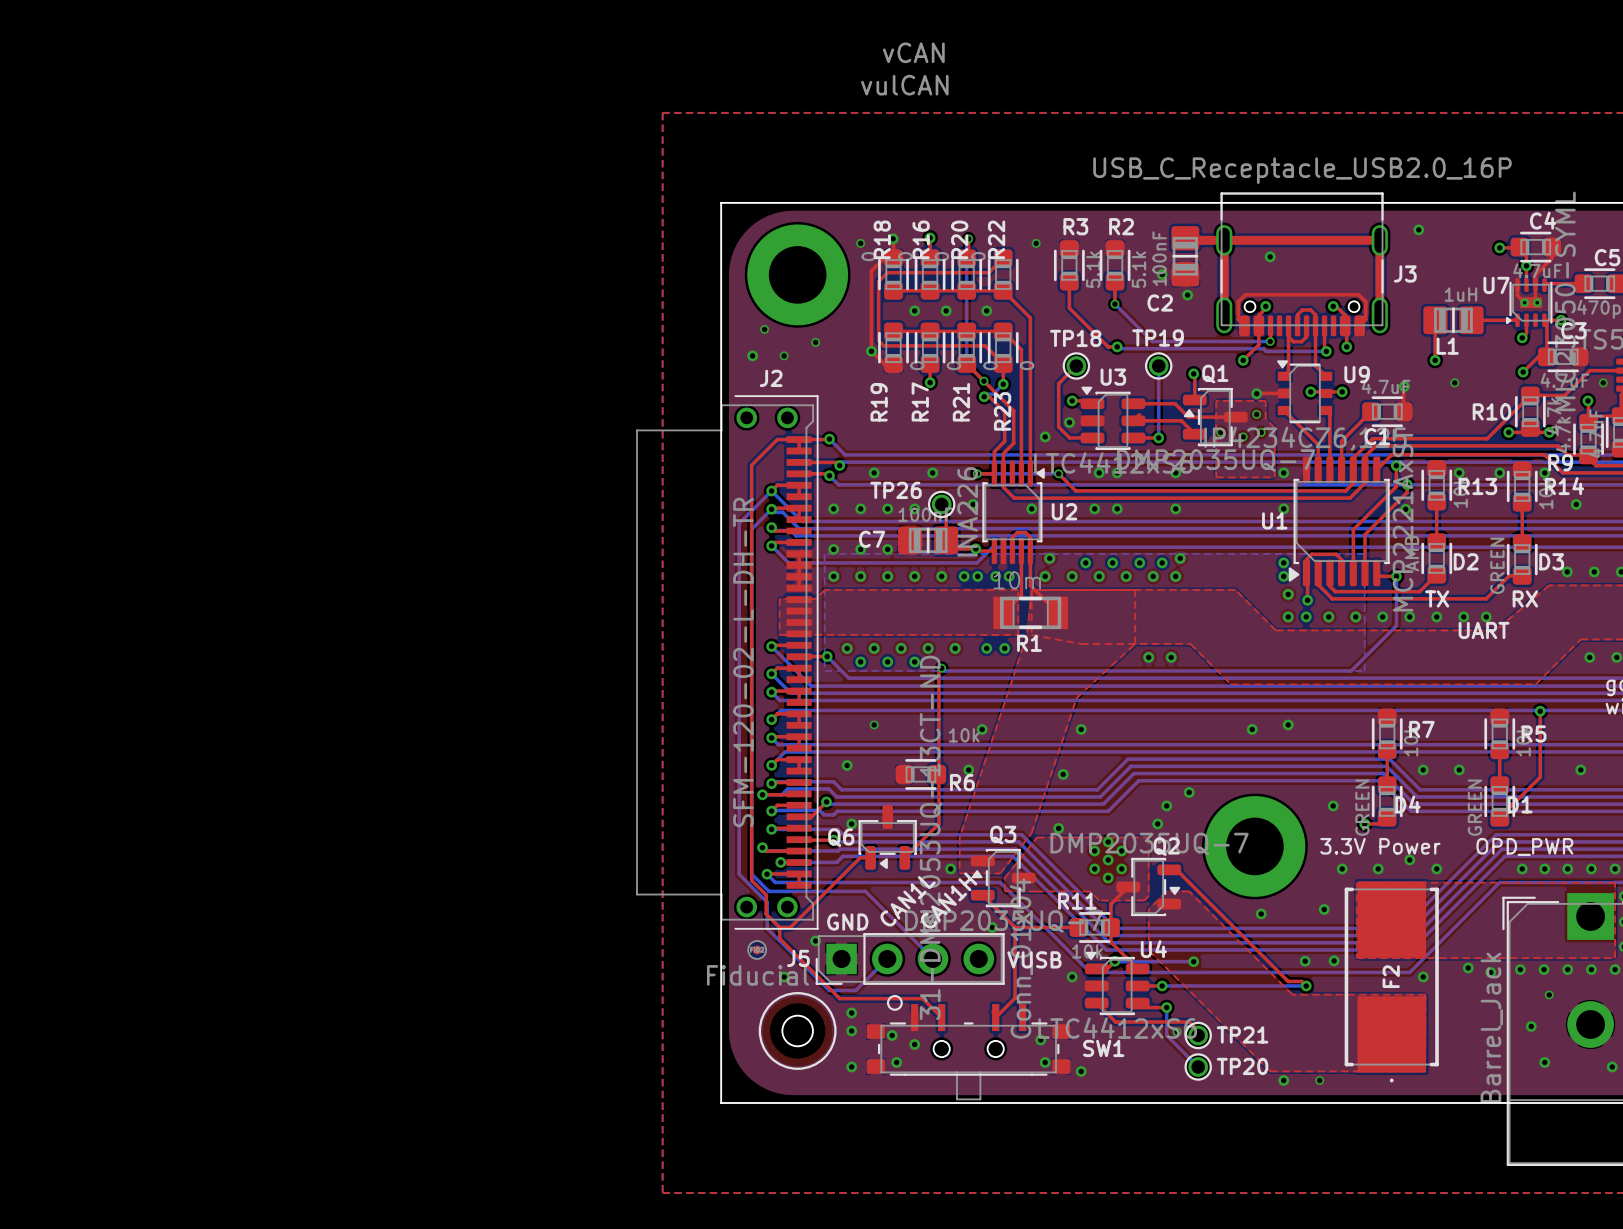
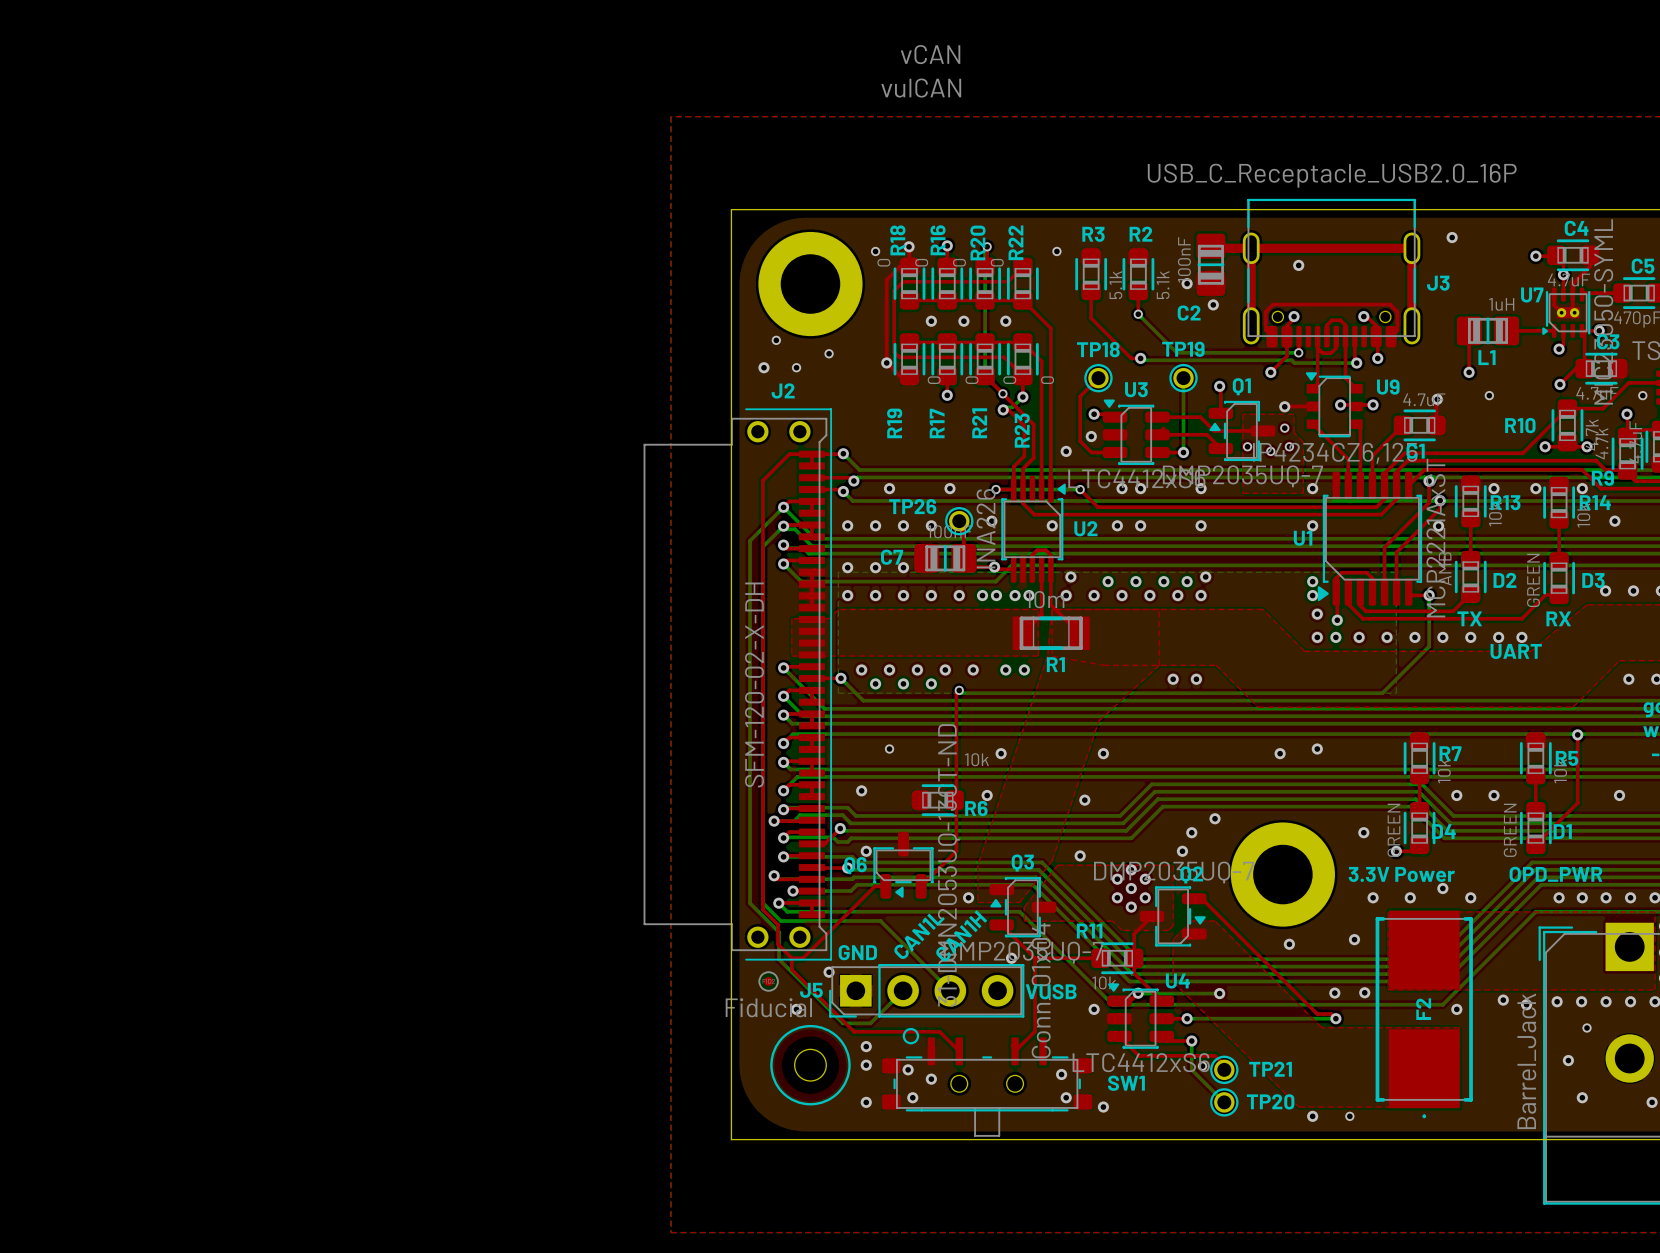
J2 value: SFM-120-02-L-DH-TR (743, 662) -> SFM-120-02-X-DH (754, 684)

